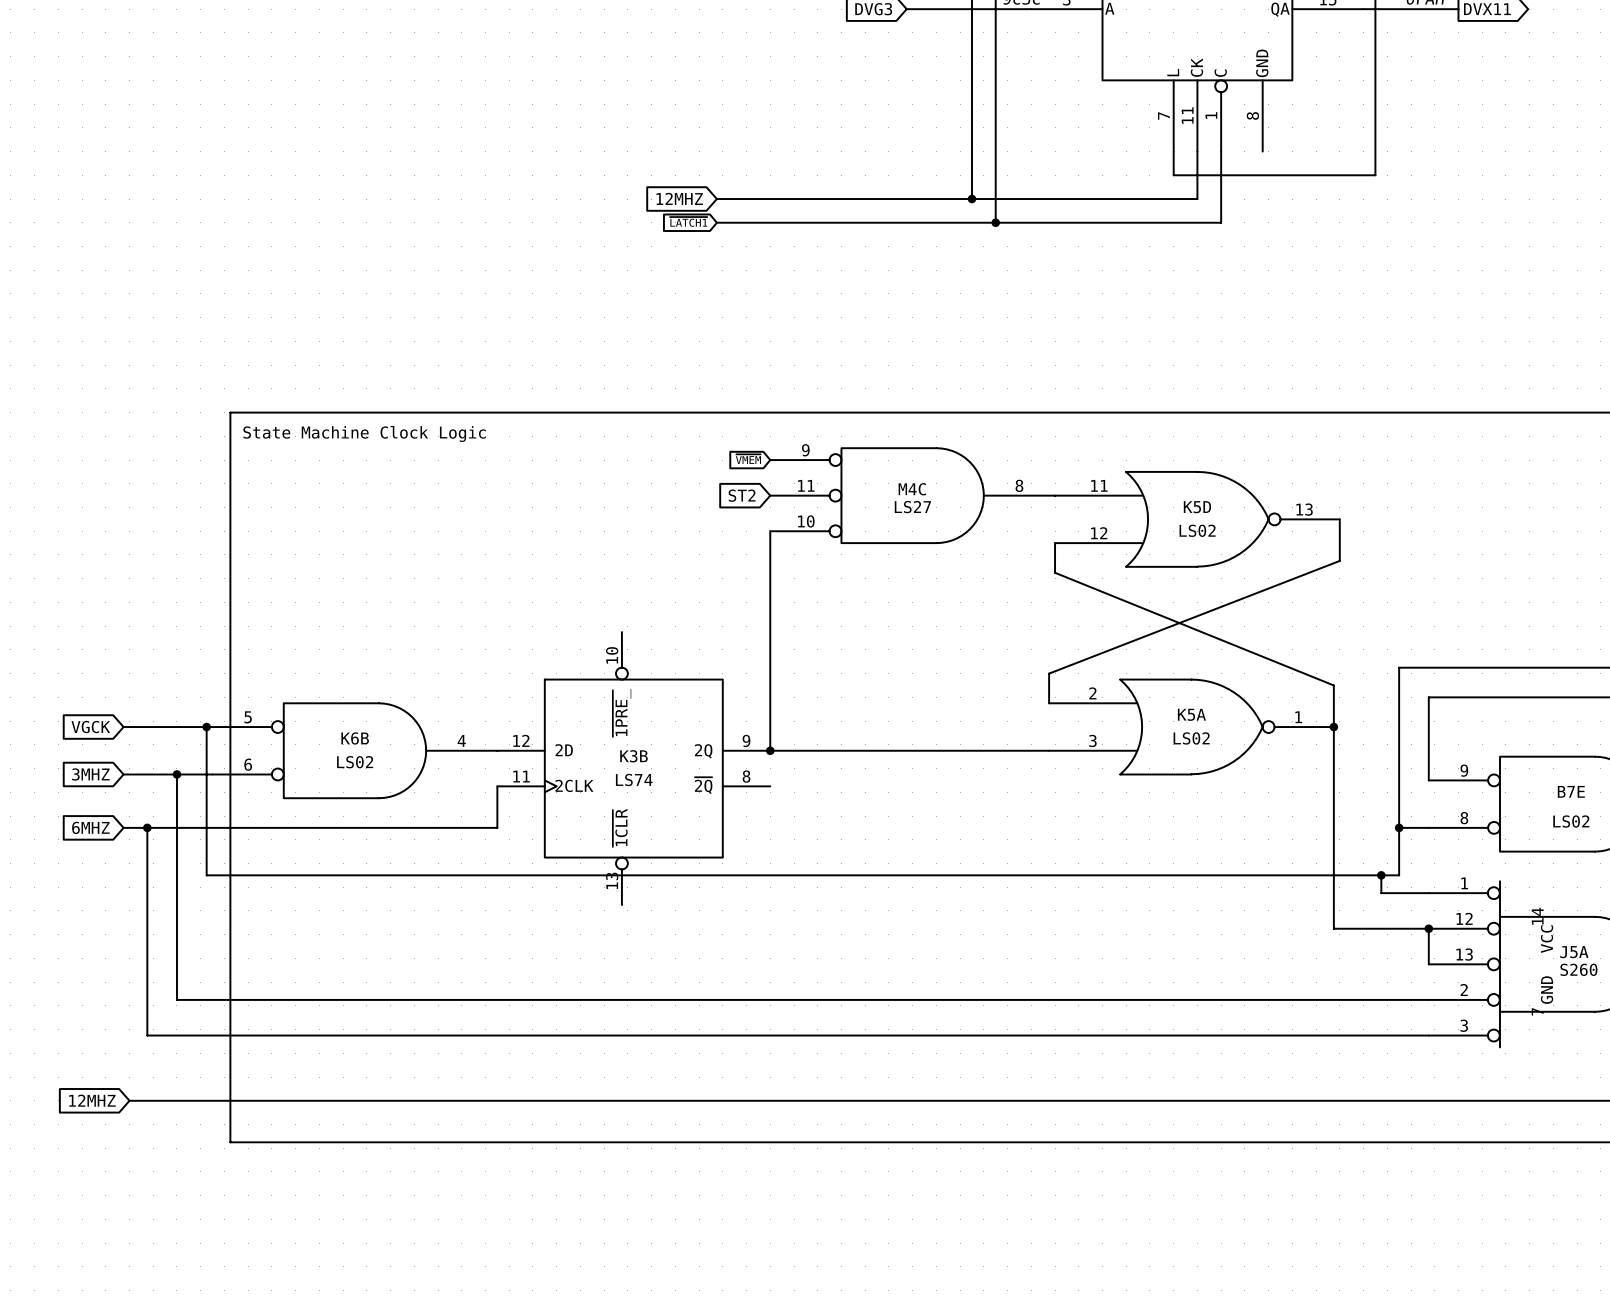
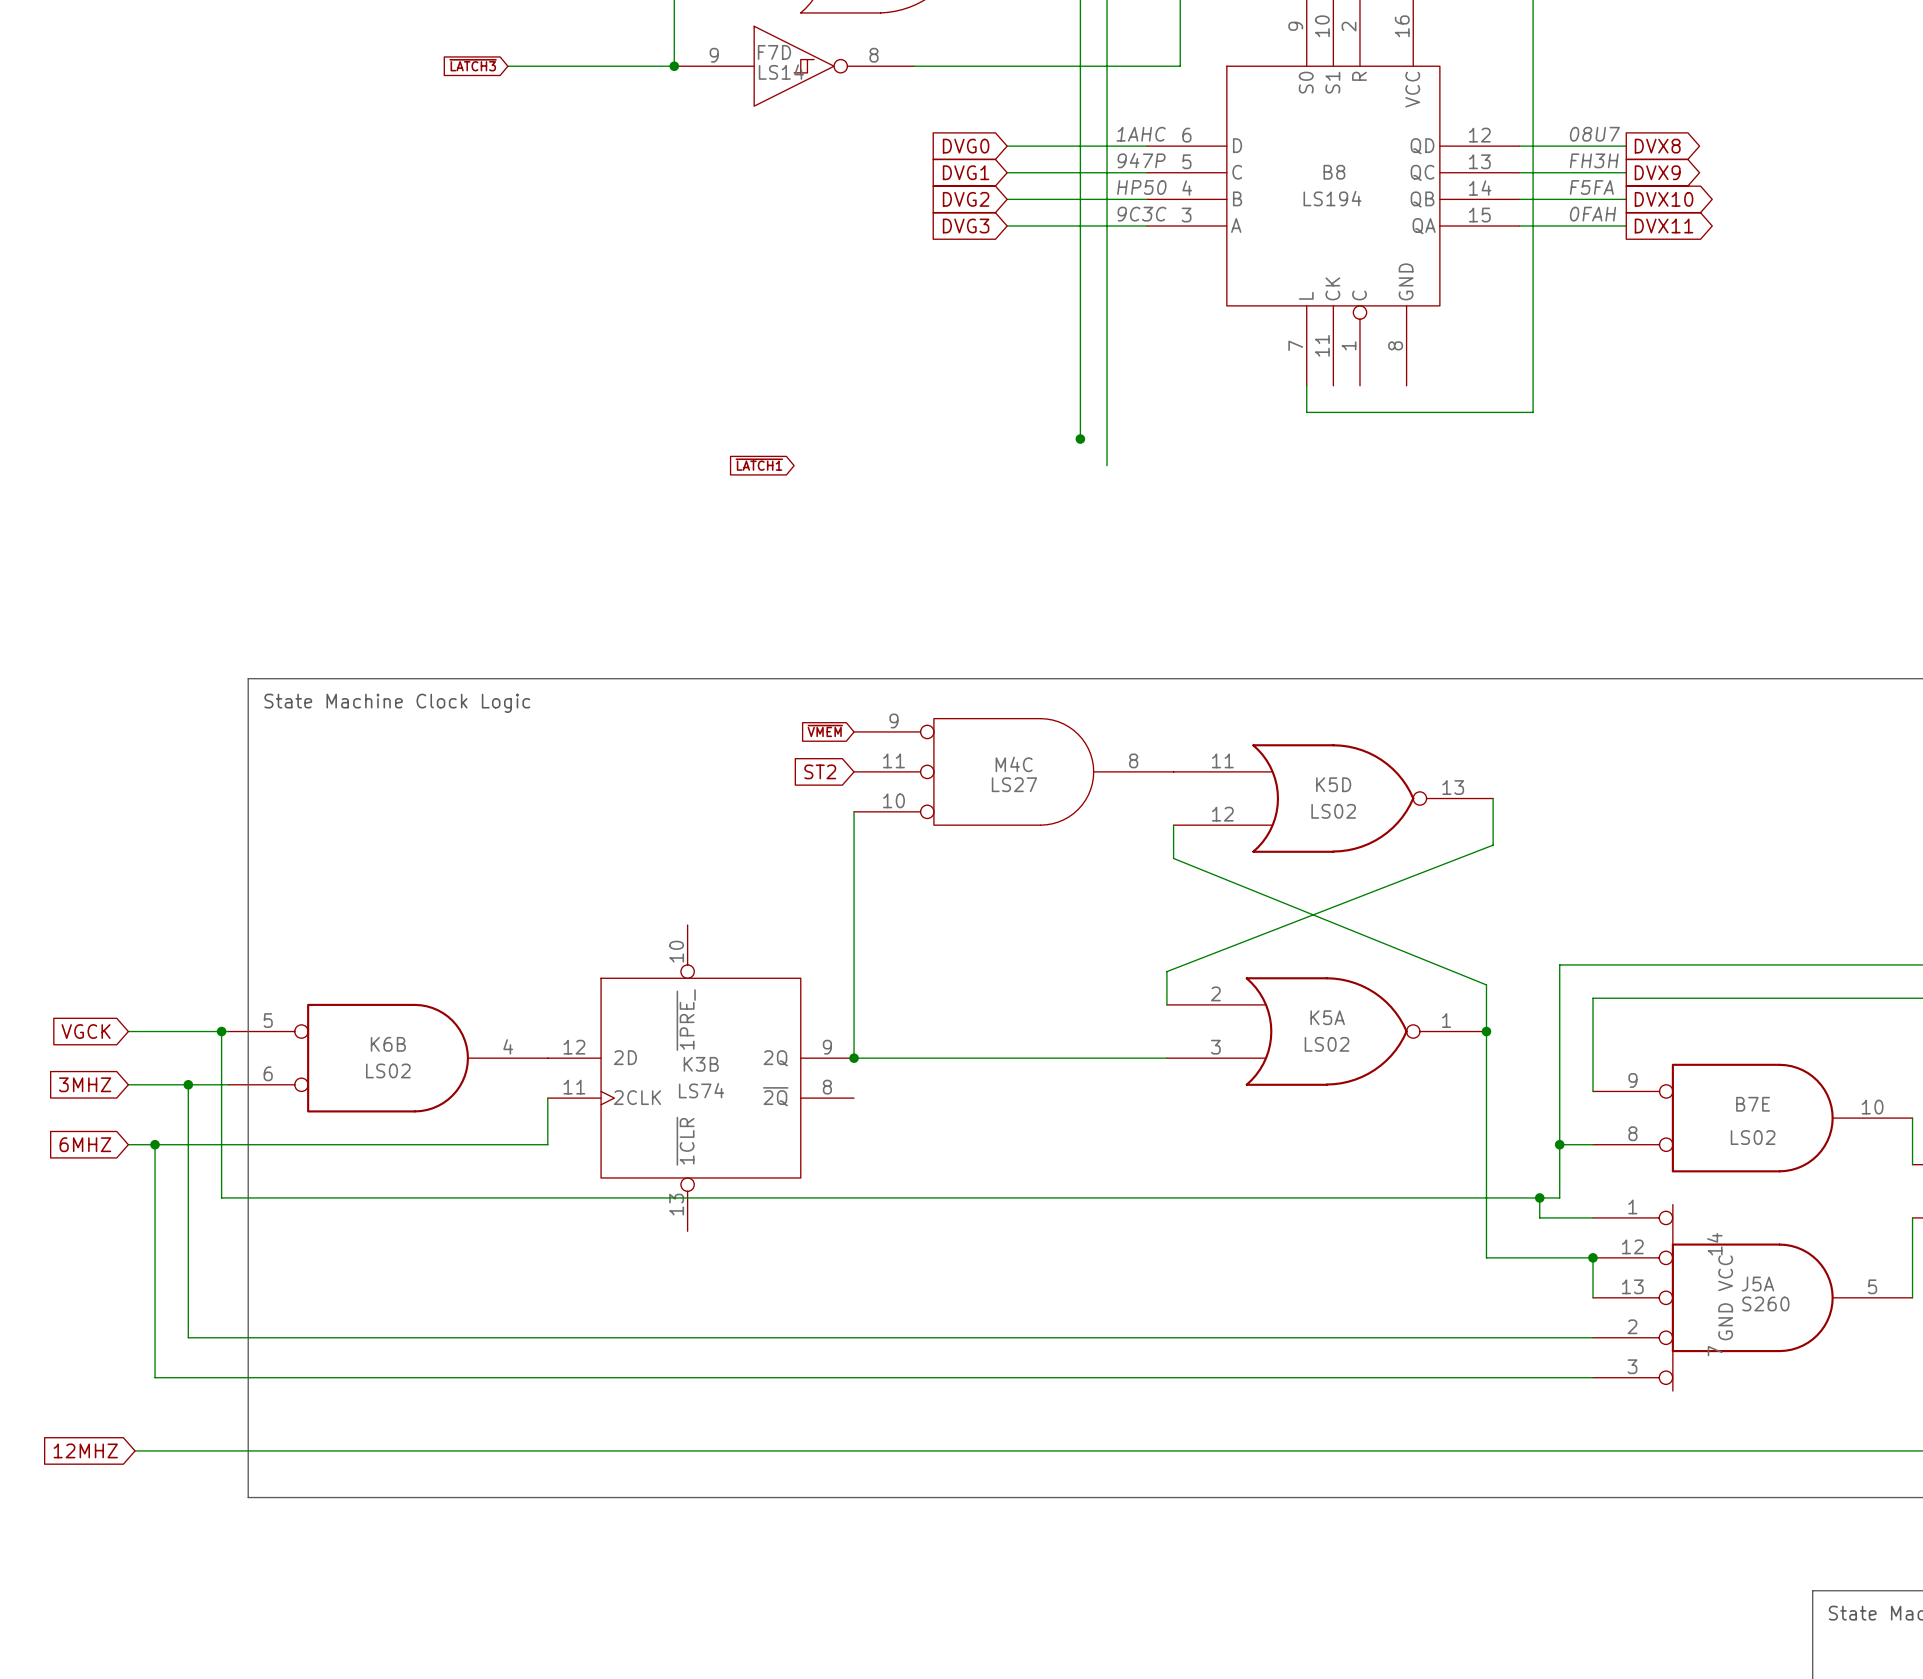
wire: (1197, 151) (1197, 199) (716, 199) -> none
wire: (1221, 151) (1221, 222) (716, 222) -> none
global label: 12MHZ (679, 198) -> none
junction: (995, 222) -> none

